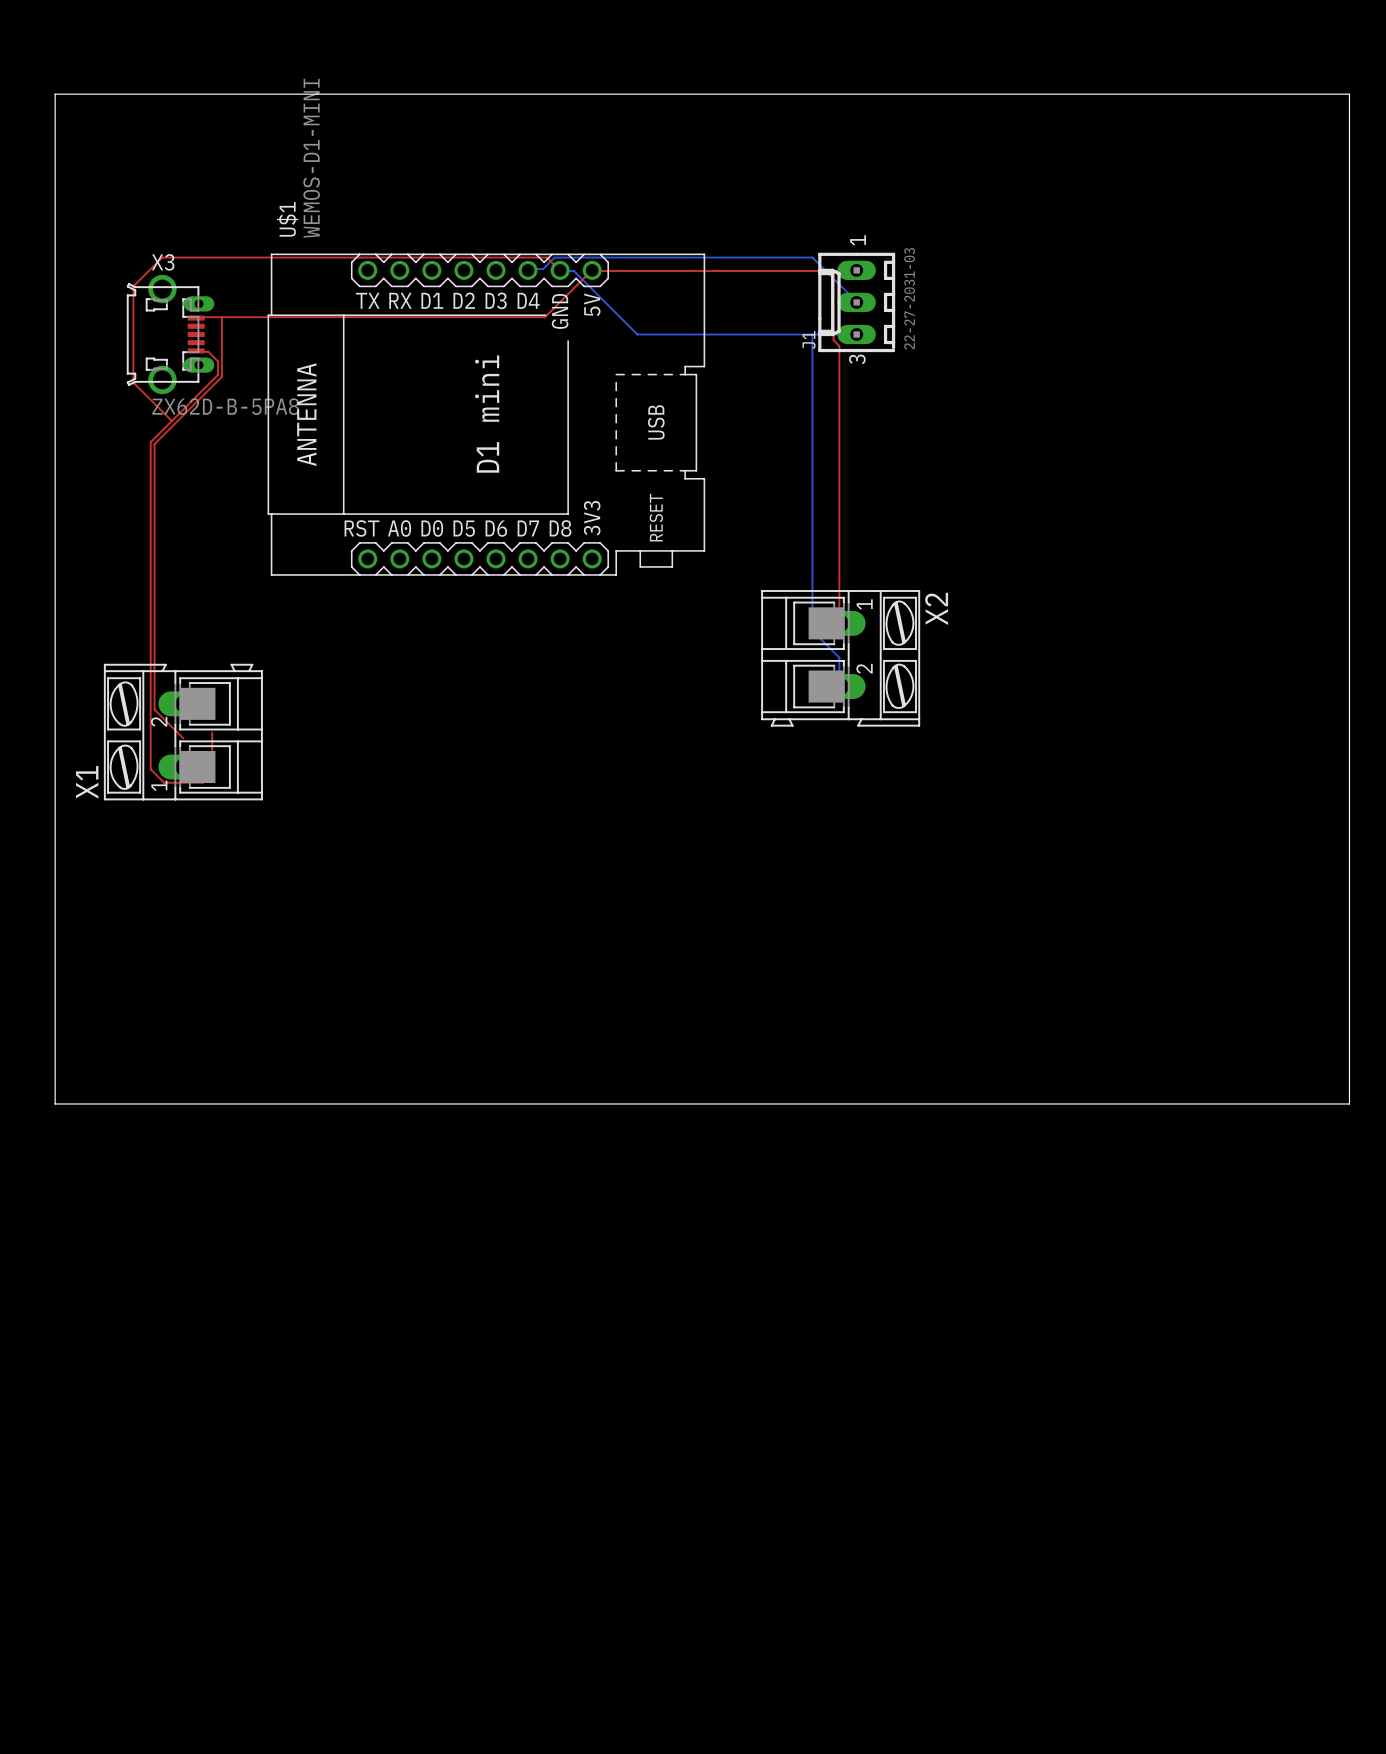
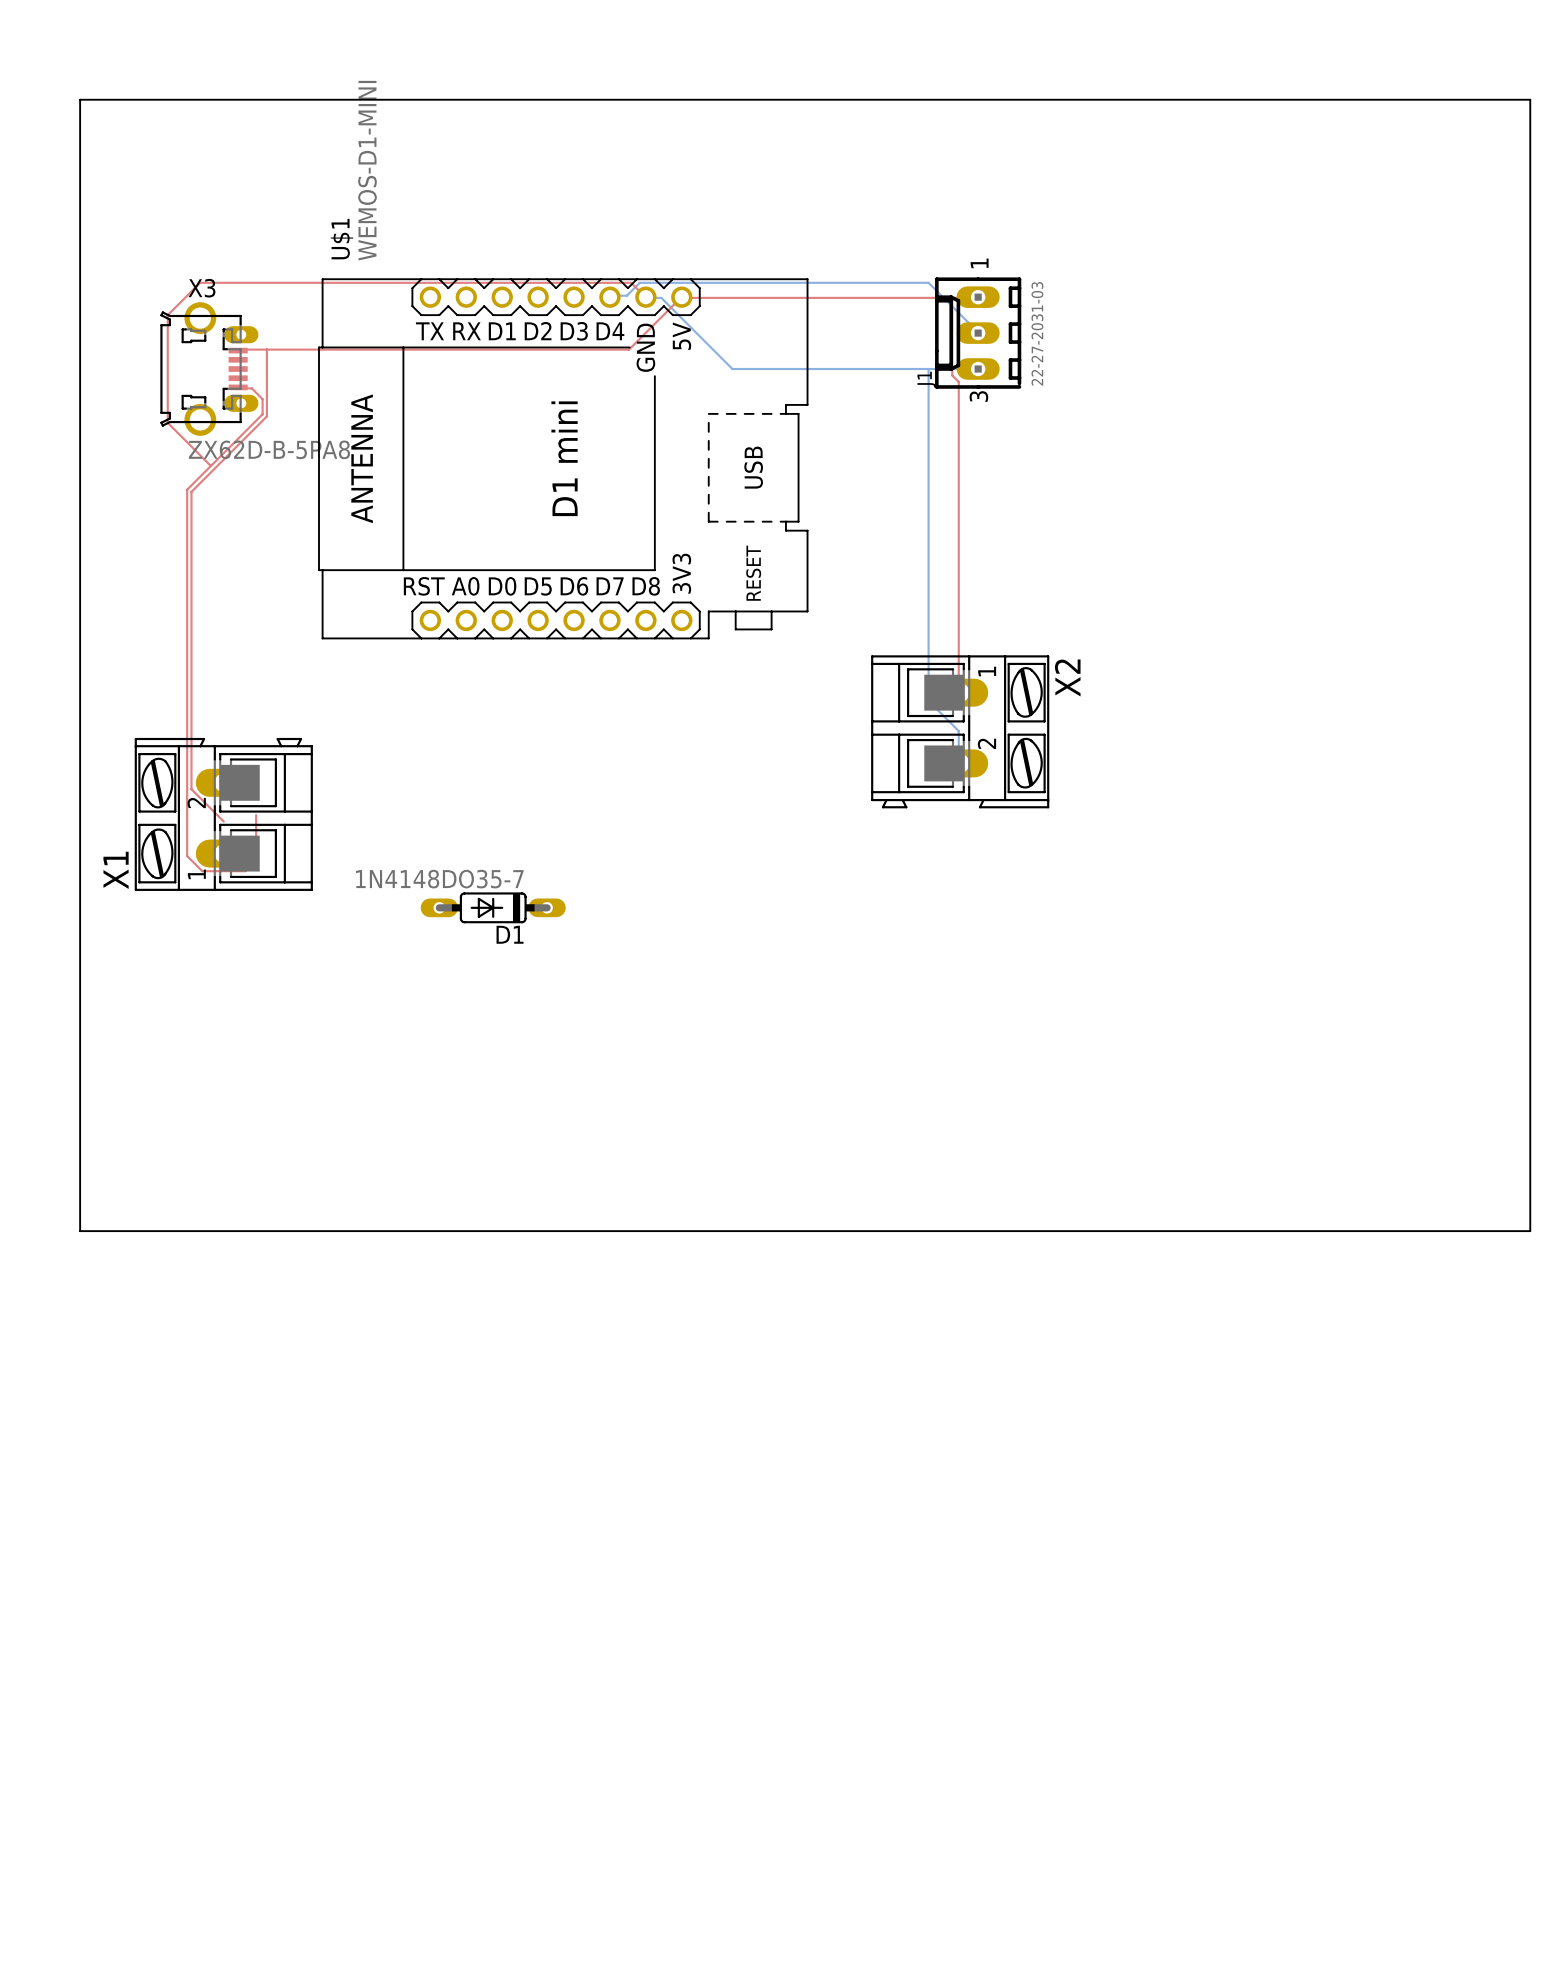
D1: none -> 1N4148DO35-7 (493, 907)

